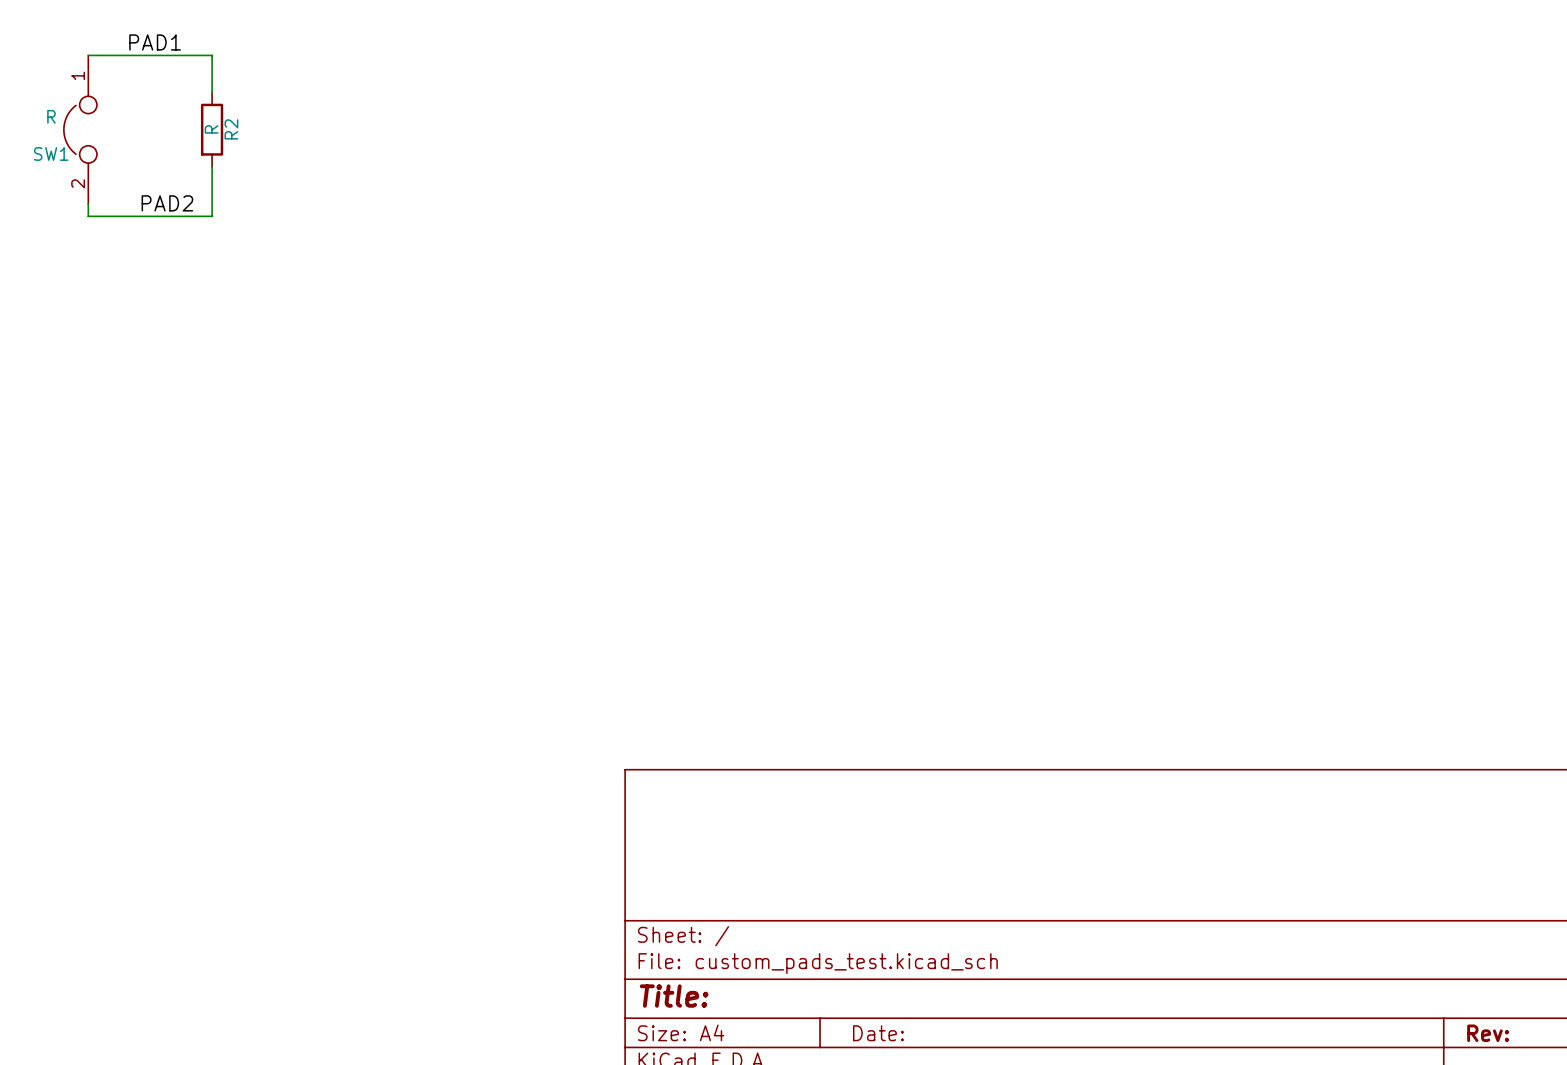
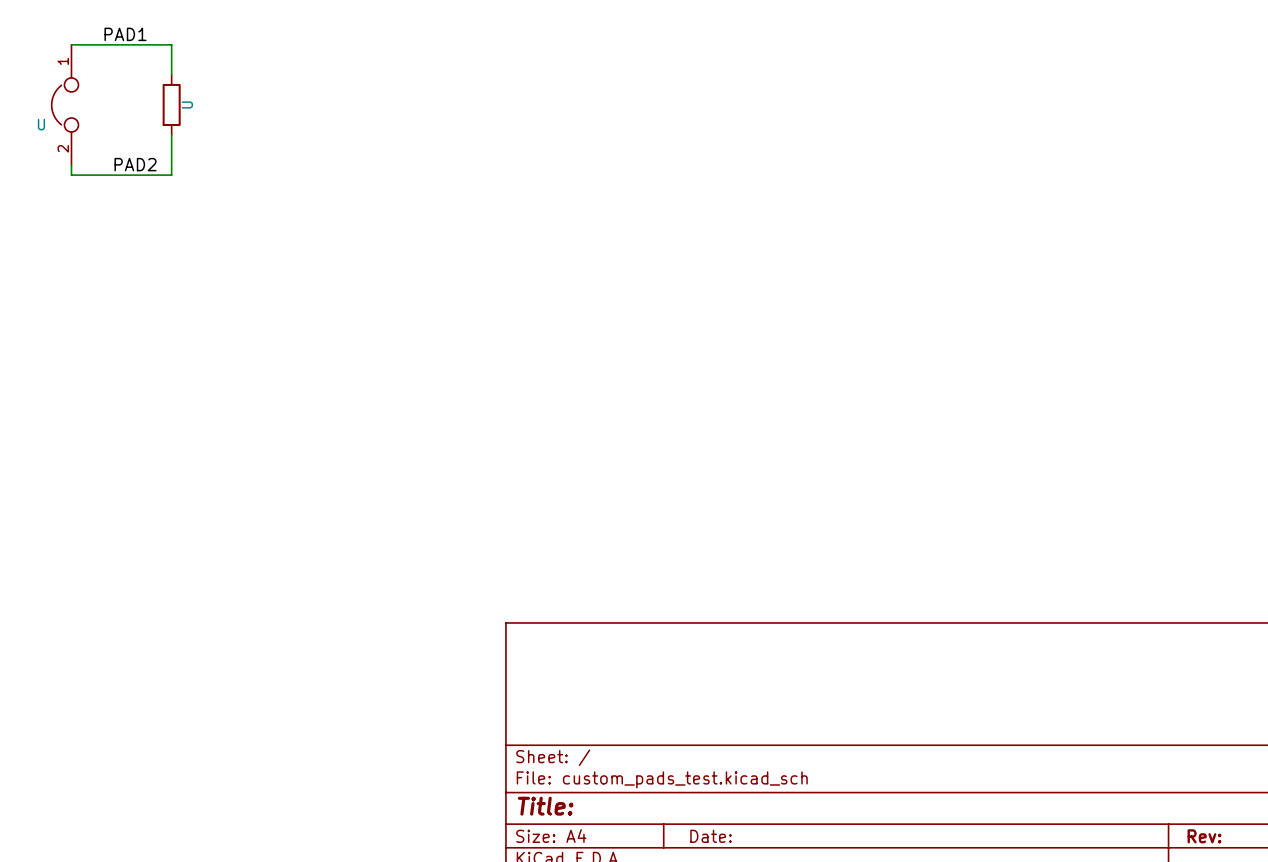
SW1 value: R (51, 116) -> none
R2 value: R (211, 129) -> none
R2 name: R2 (231, 129) -> U (187, 104)
SW1 name: SW1 (51, 153) -> U (41, 124)

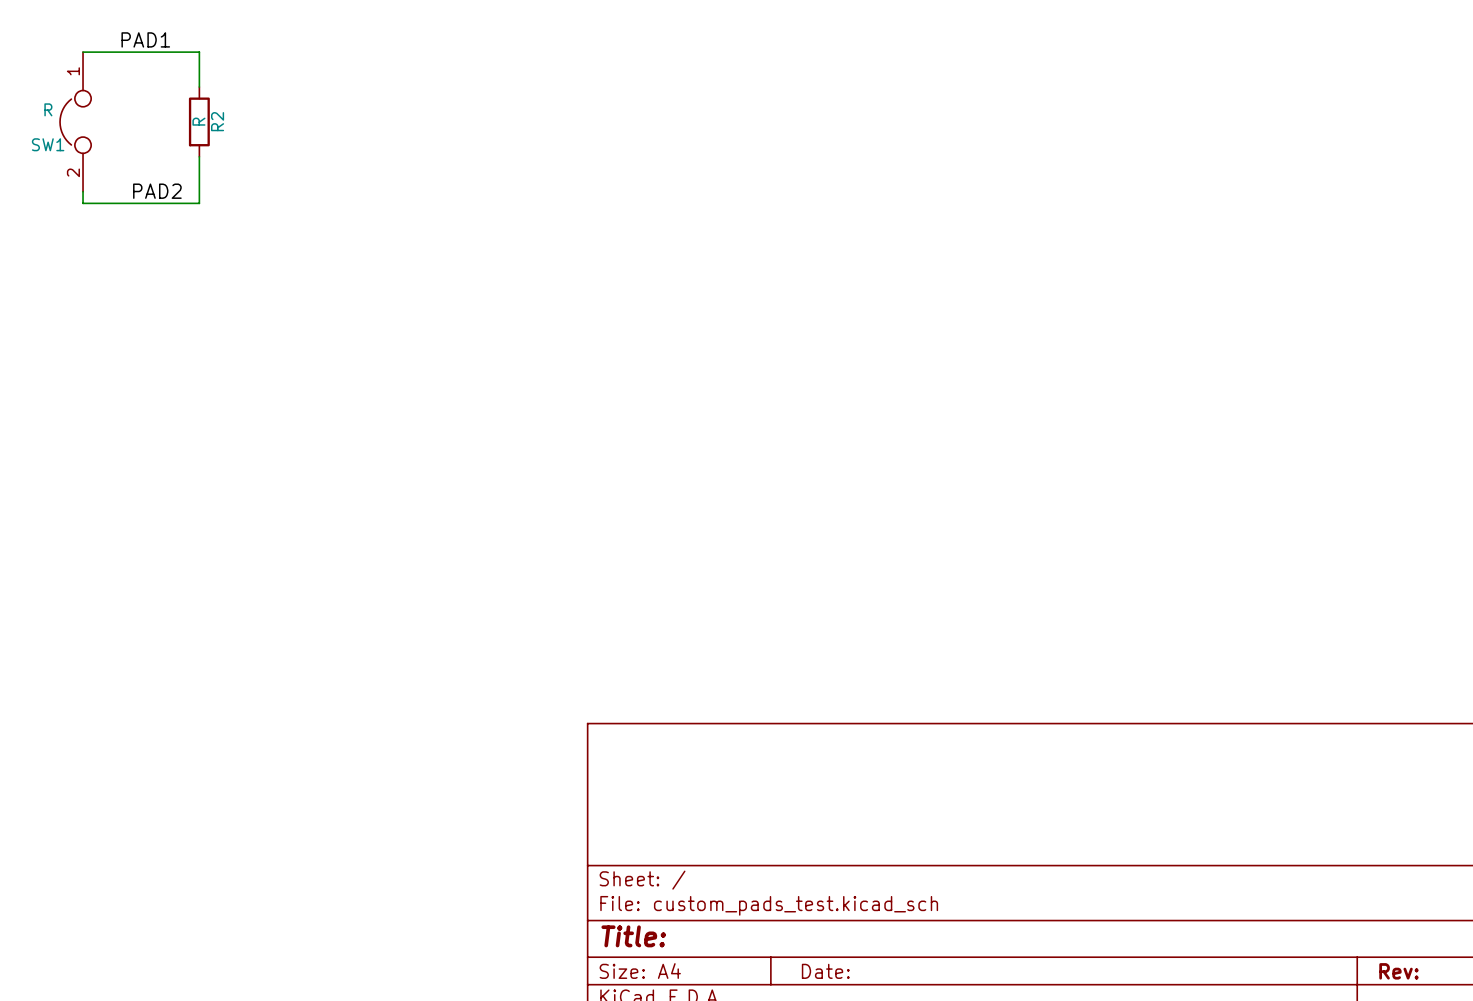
U value: none -> R (48, 109)
U value: none -> R (198, 121)
U name: U (187, 104) -> R2 (217, 121)
U name: U (41, 124) -> SW1 (48, 144)

